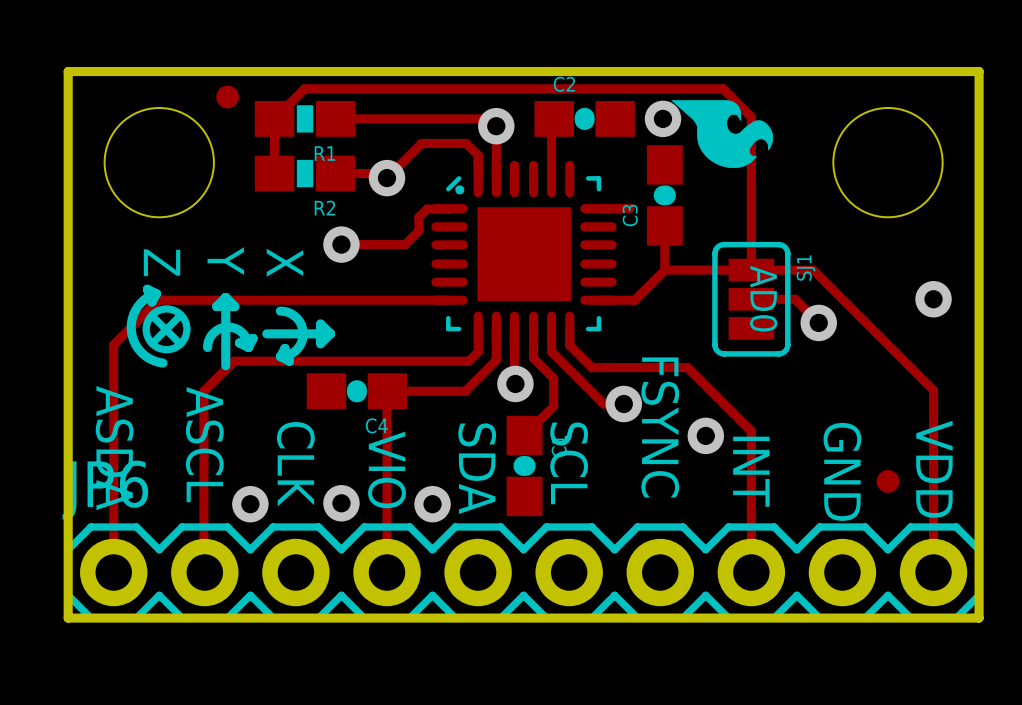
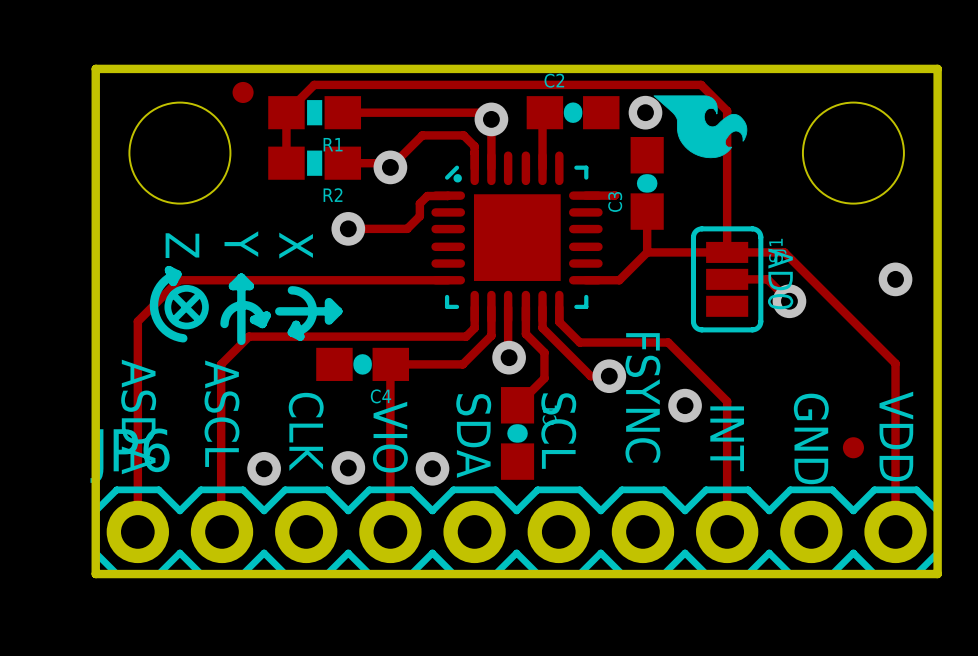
text position: AD0 (763, 298) -> AD0 (780, 278)

